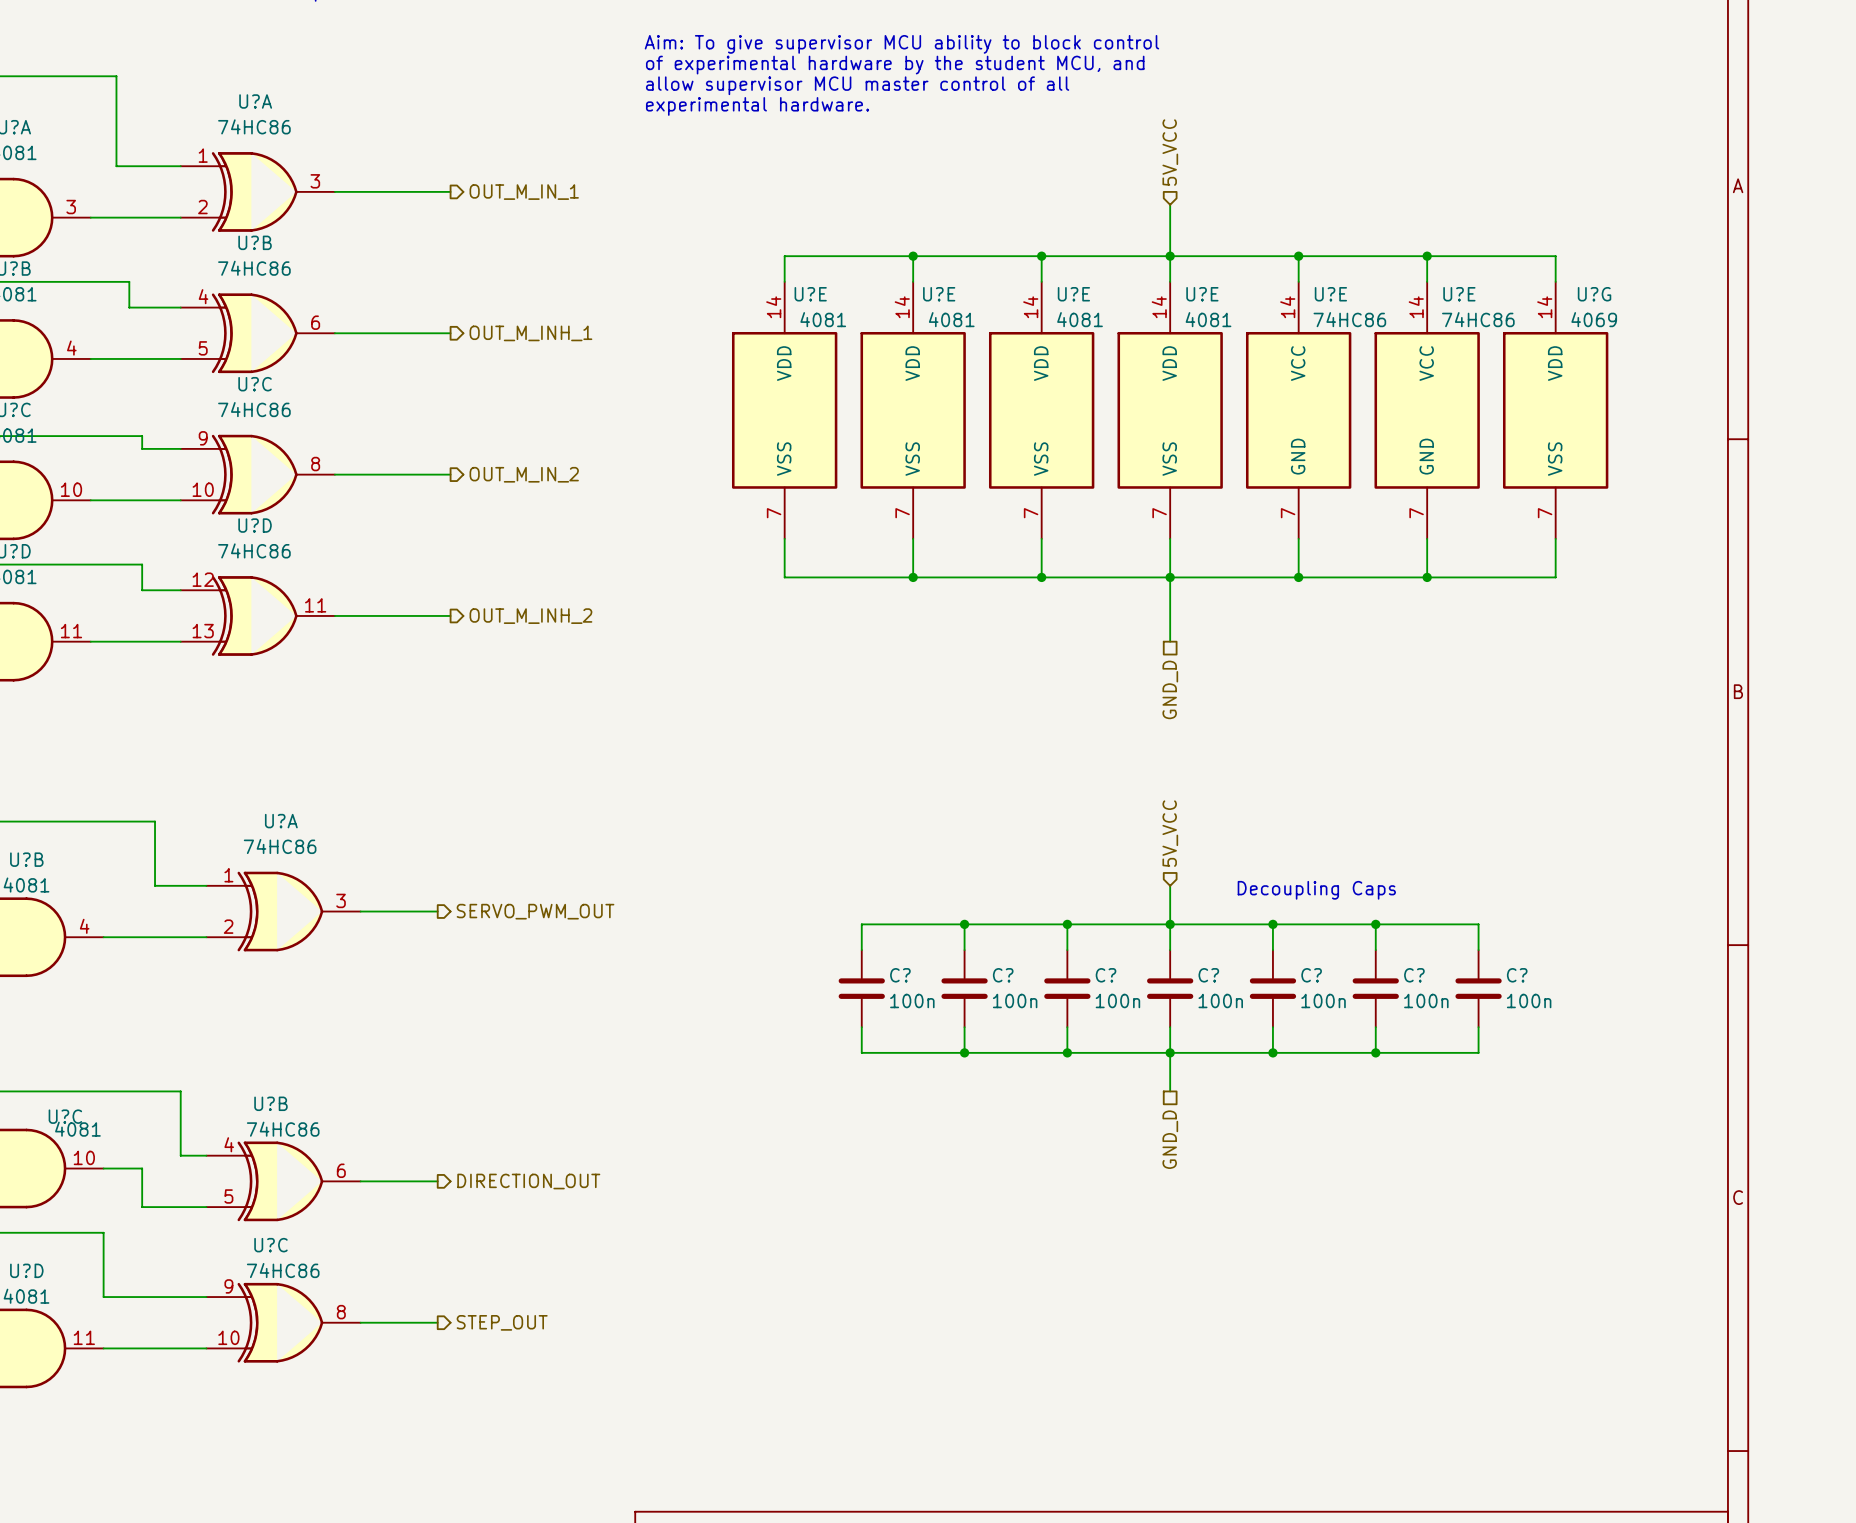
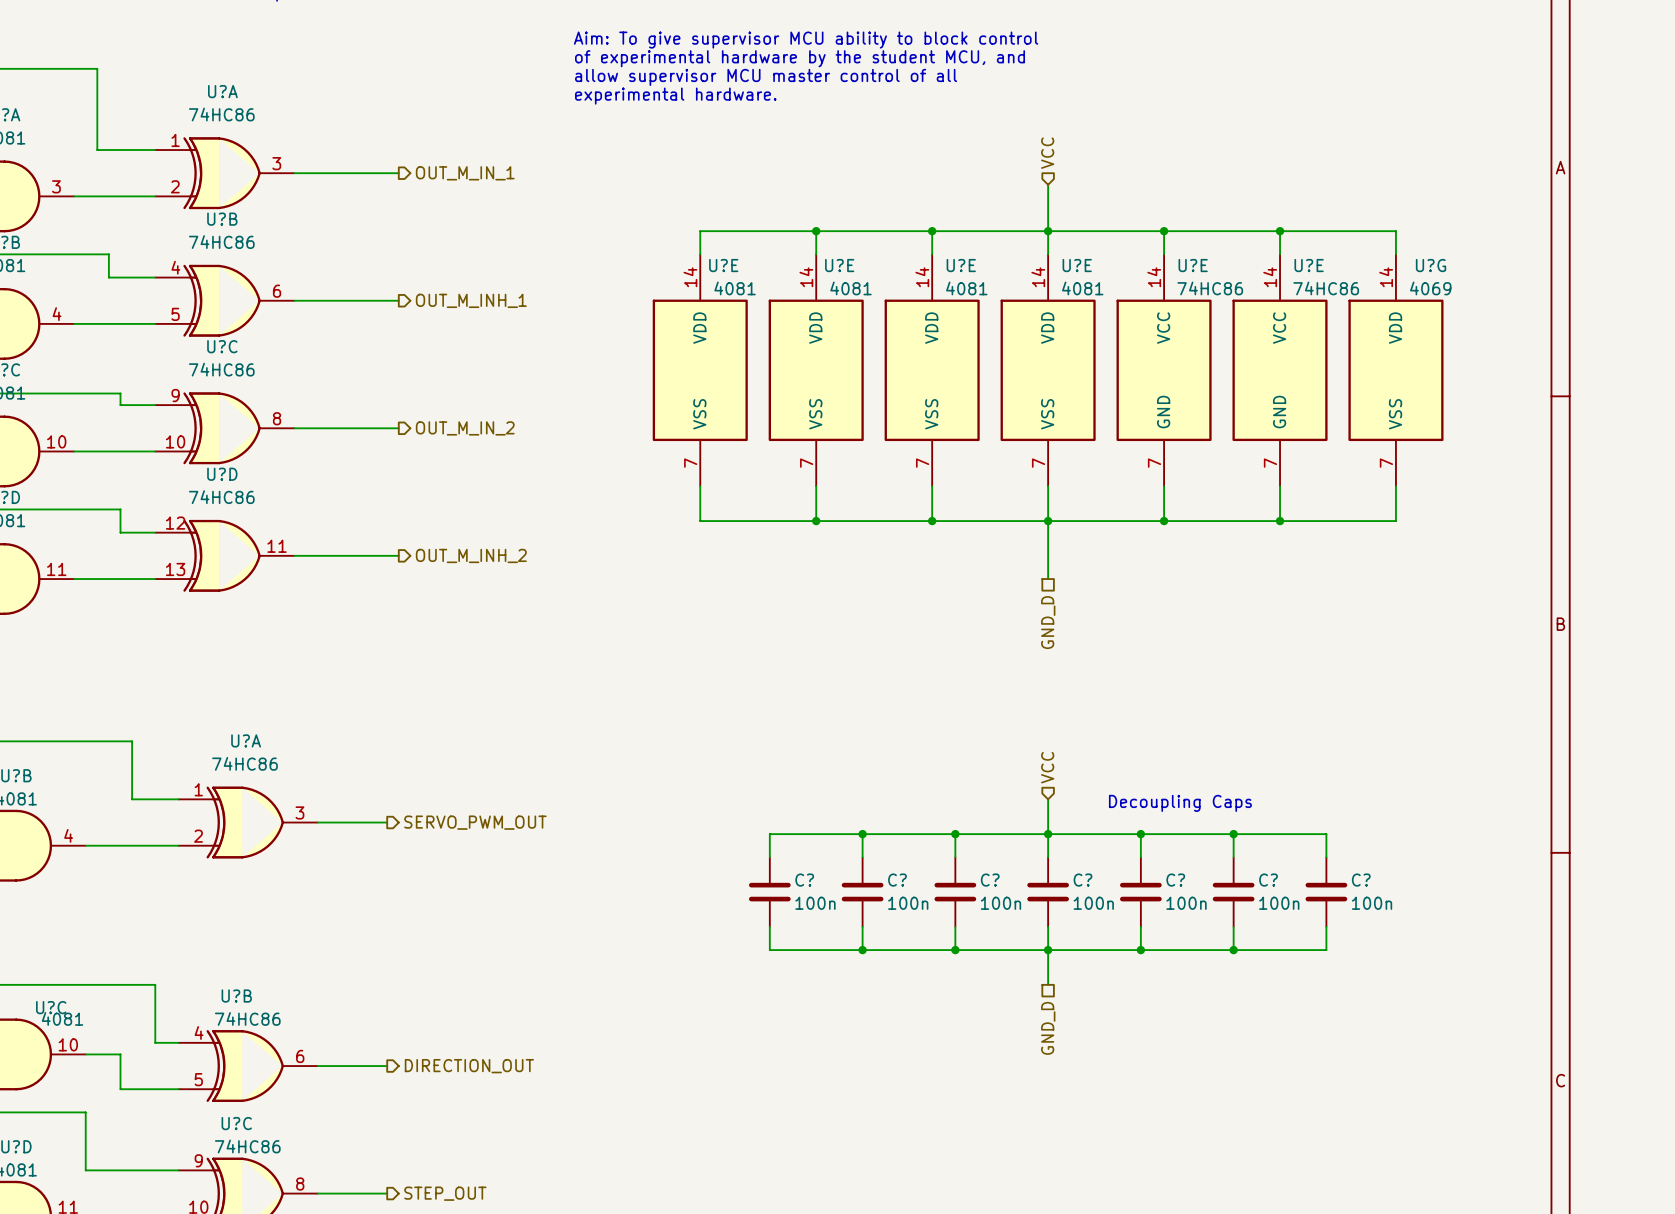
hierarchical label: 5V_VCC (1170, 152) -> VCC (1047, 153)
hierarchical label: 5V_VCC (1170, 833) -> VCC (1047, 767)

